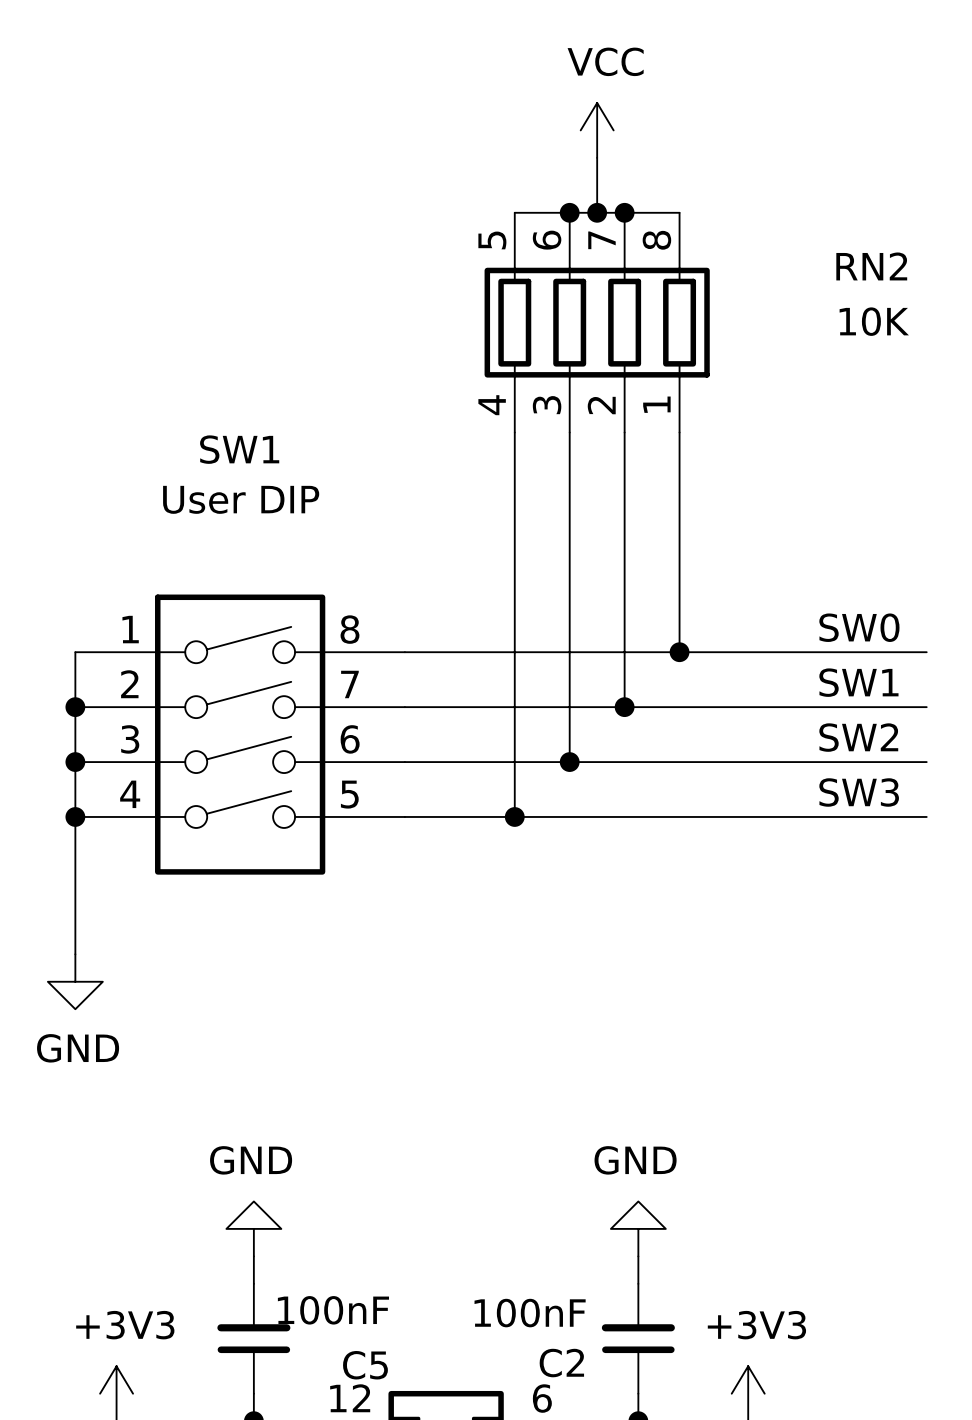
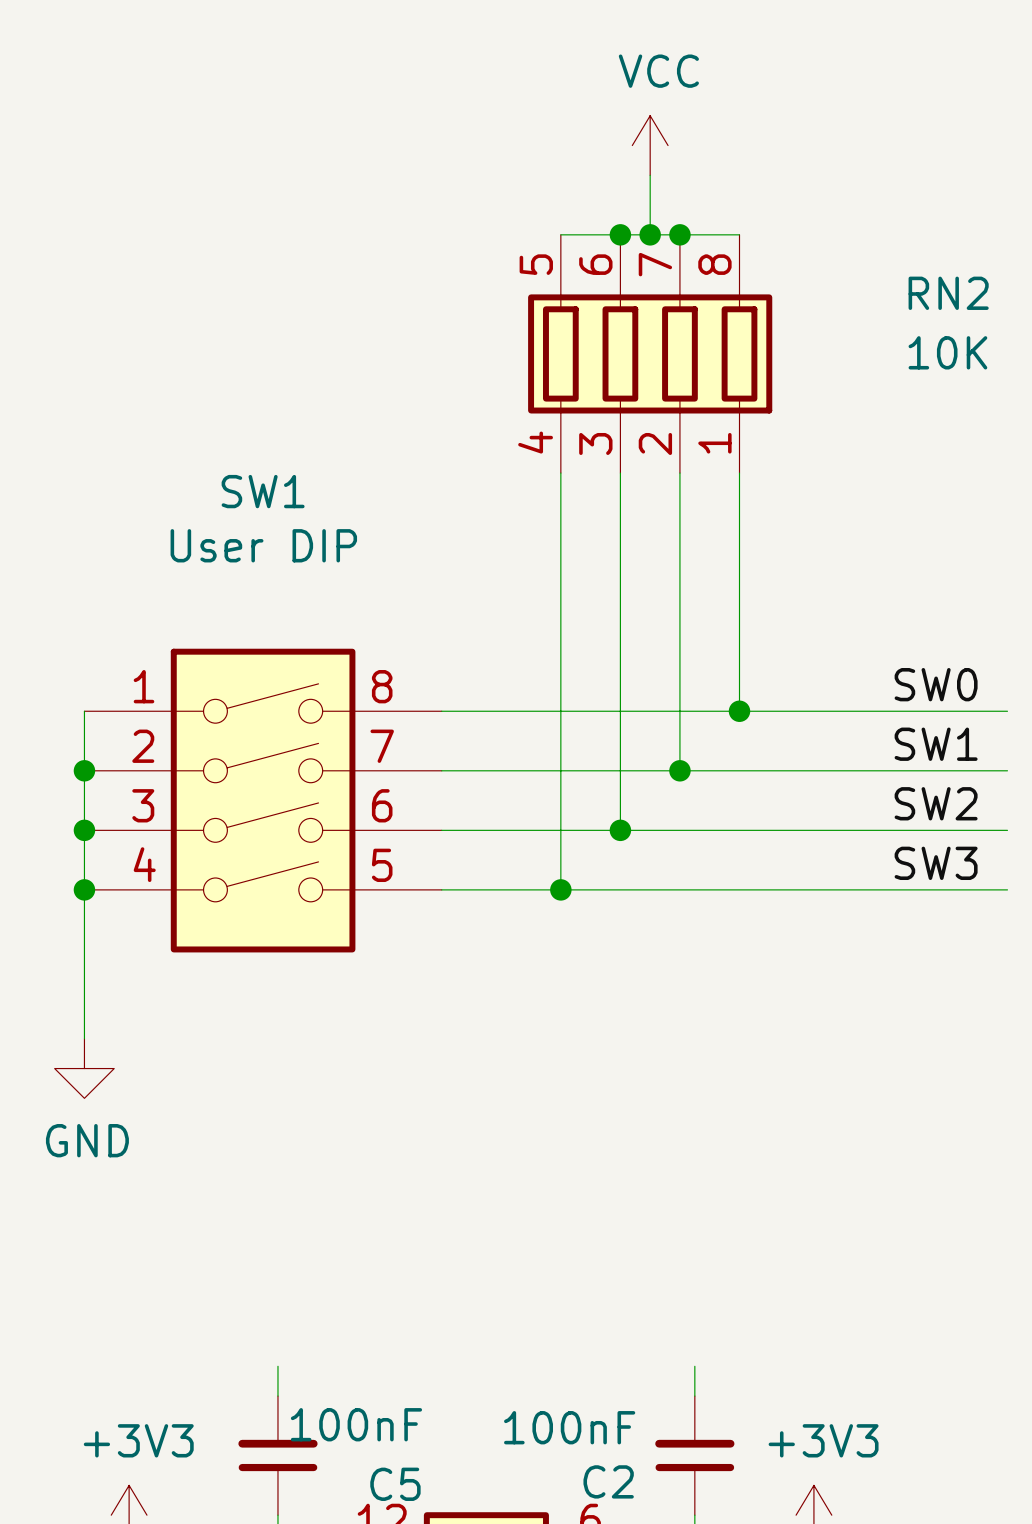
power symbol: GND (253, 1228) -> none
power symbol: GND (638, 1228) -> none

